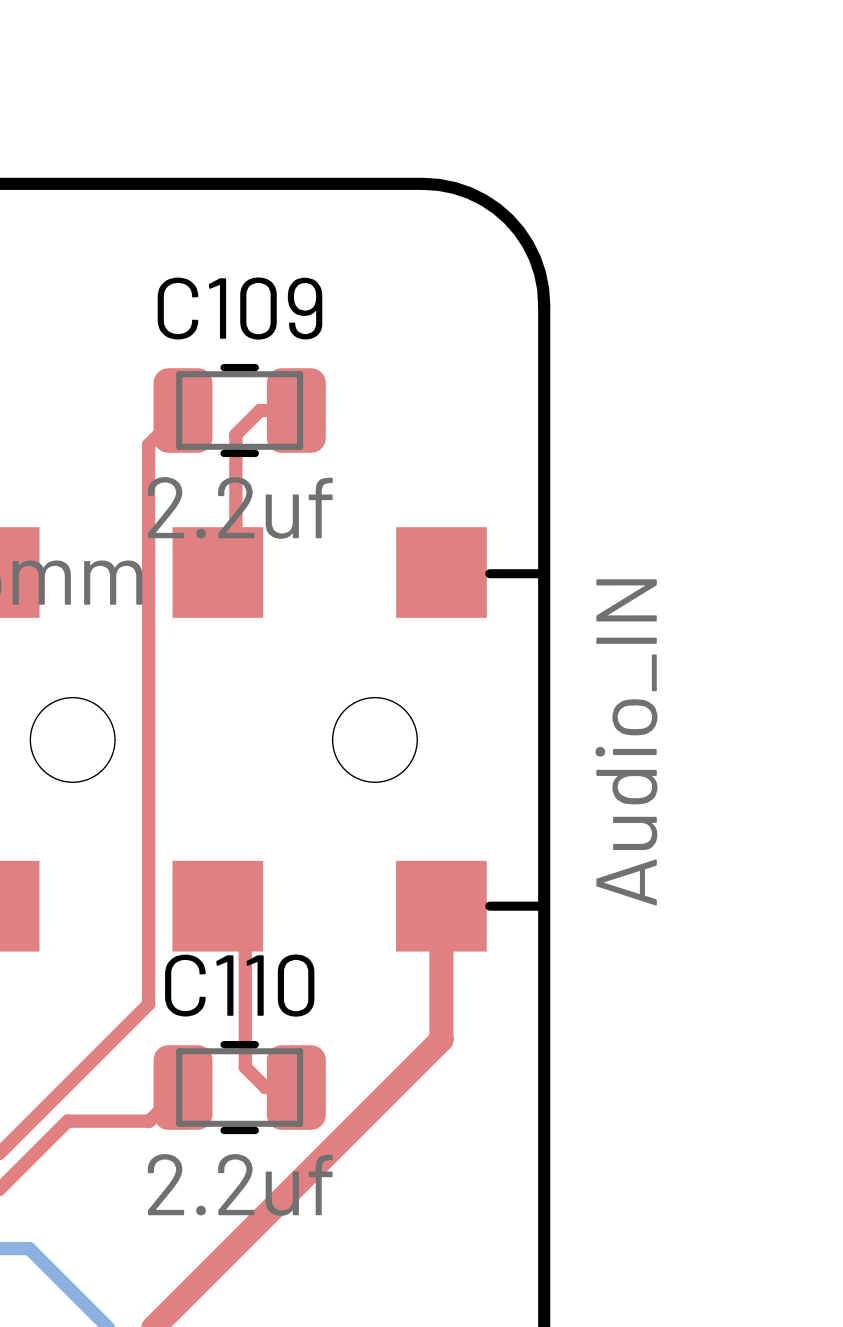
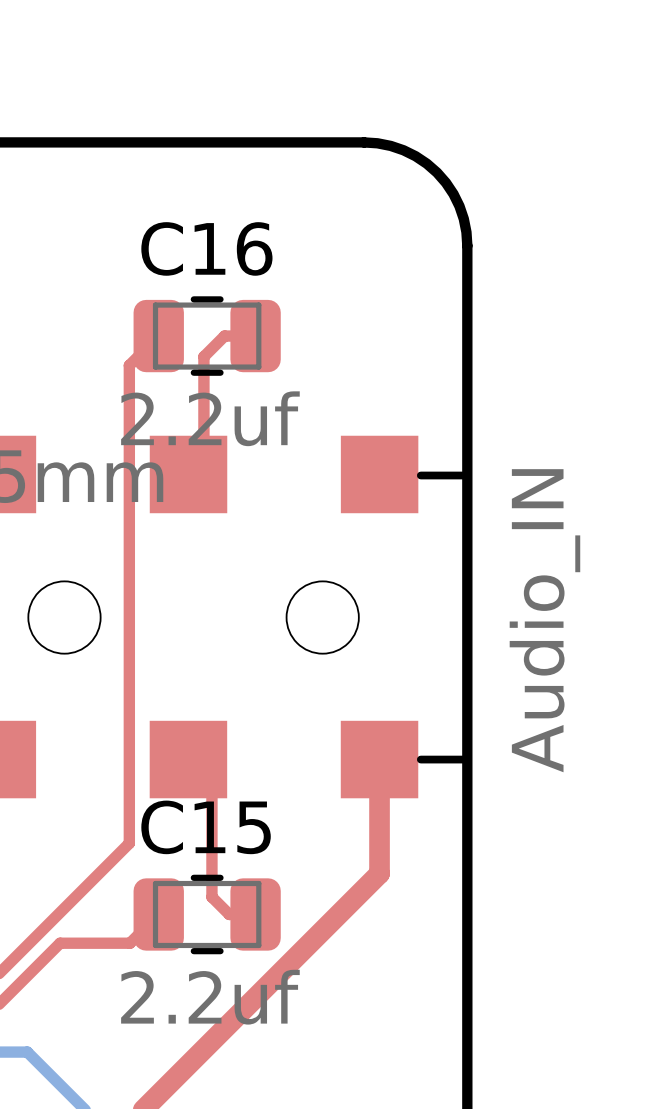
C109 name: C109 (239, 308) -> C16 (206, 248)
C110 name: C110 (239, 985) -> C15 (206, 827)

